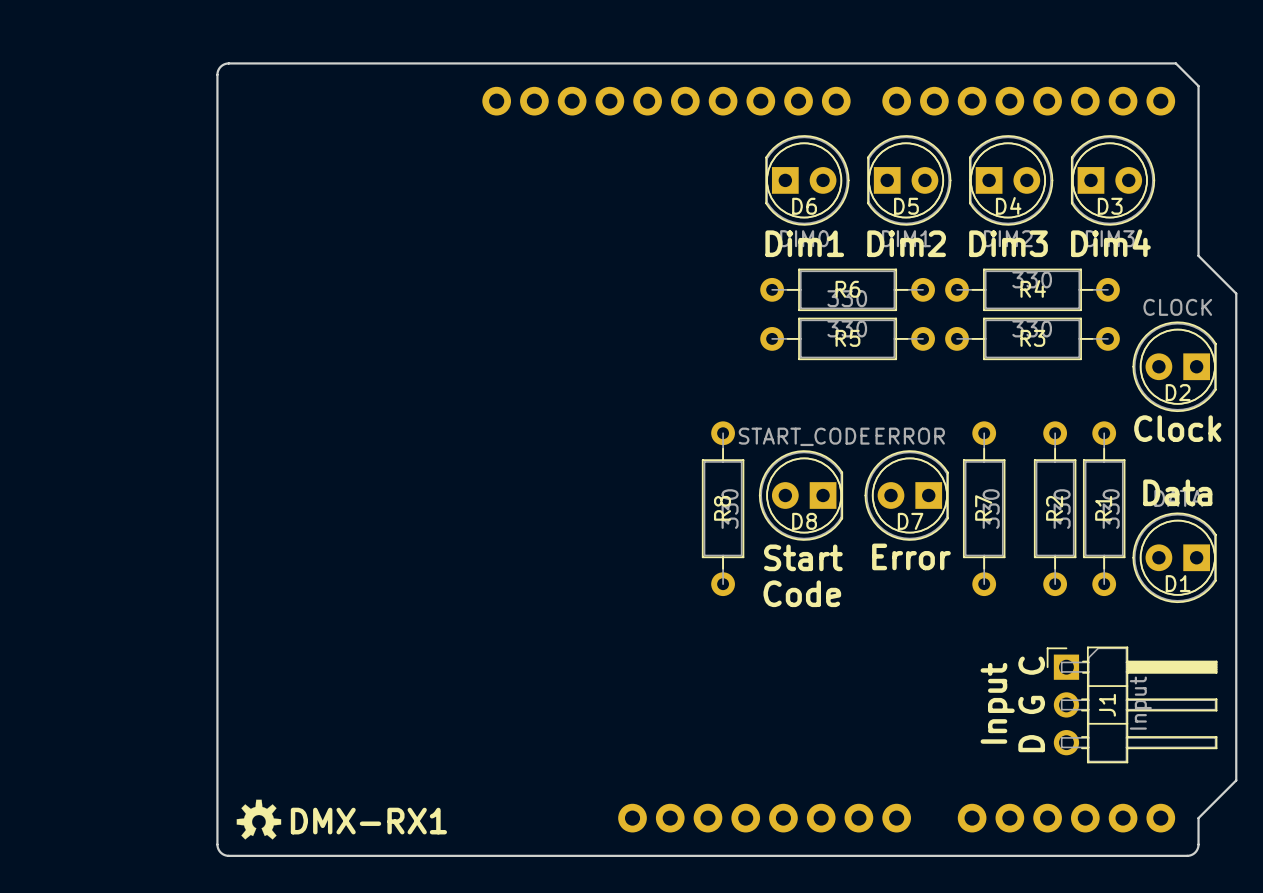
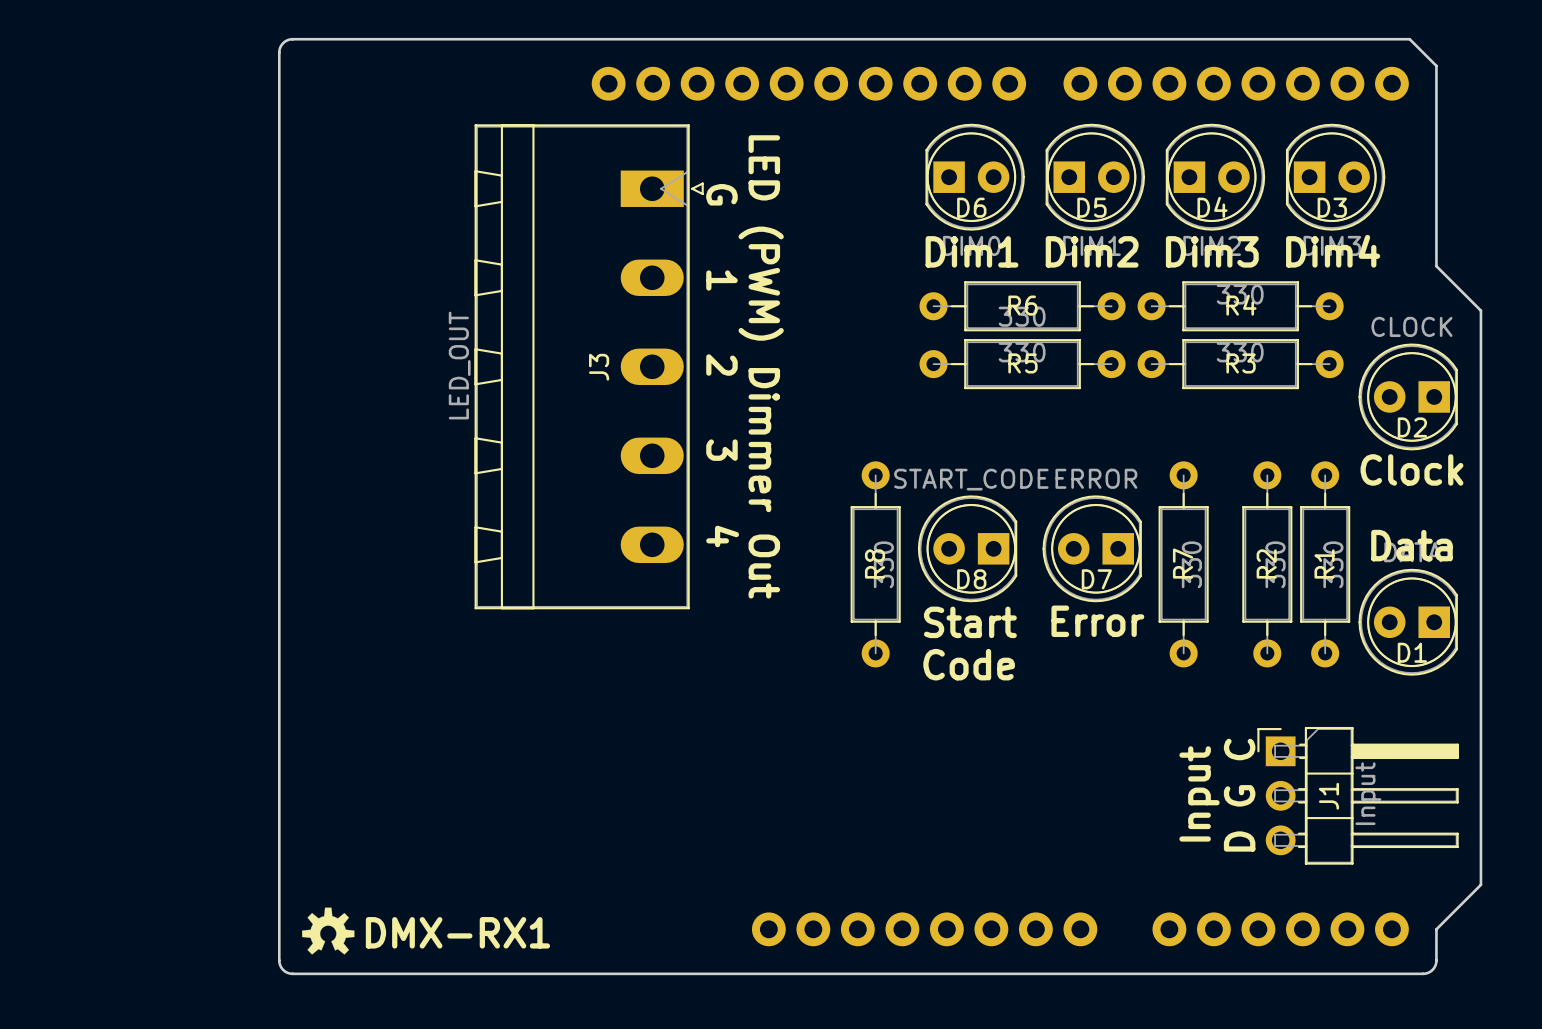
text: none -> G 1 2 3 4 (722, 365)
J3: none -> LED_OUT (589, 366)
text: none -> LED (PWM) Dimmer Out (761, 366)

